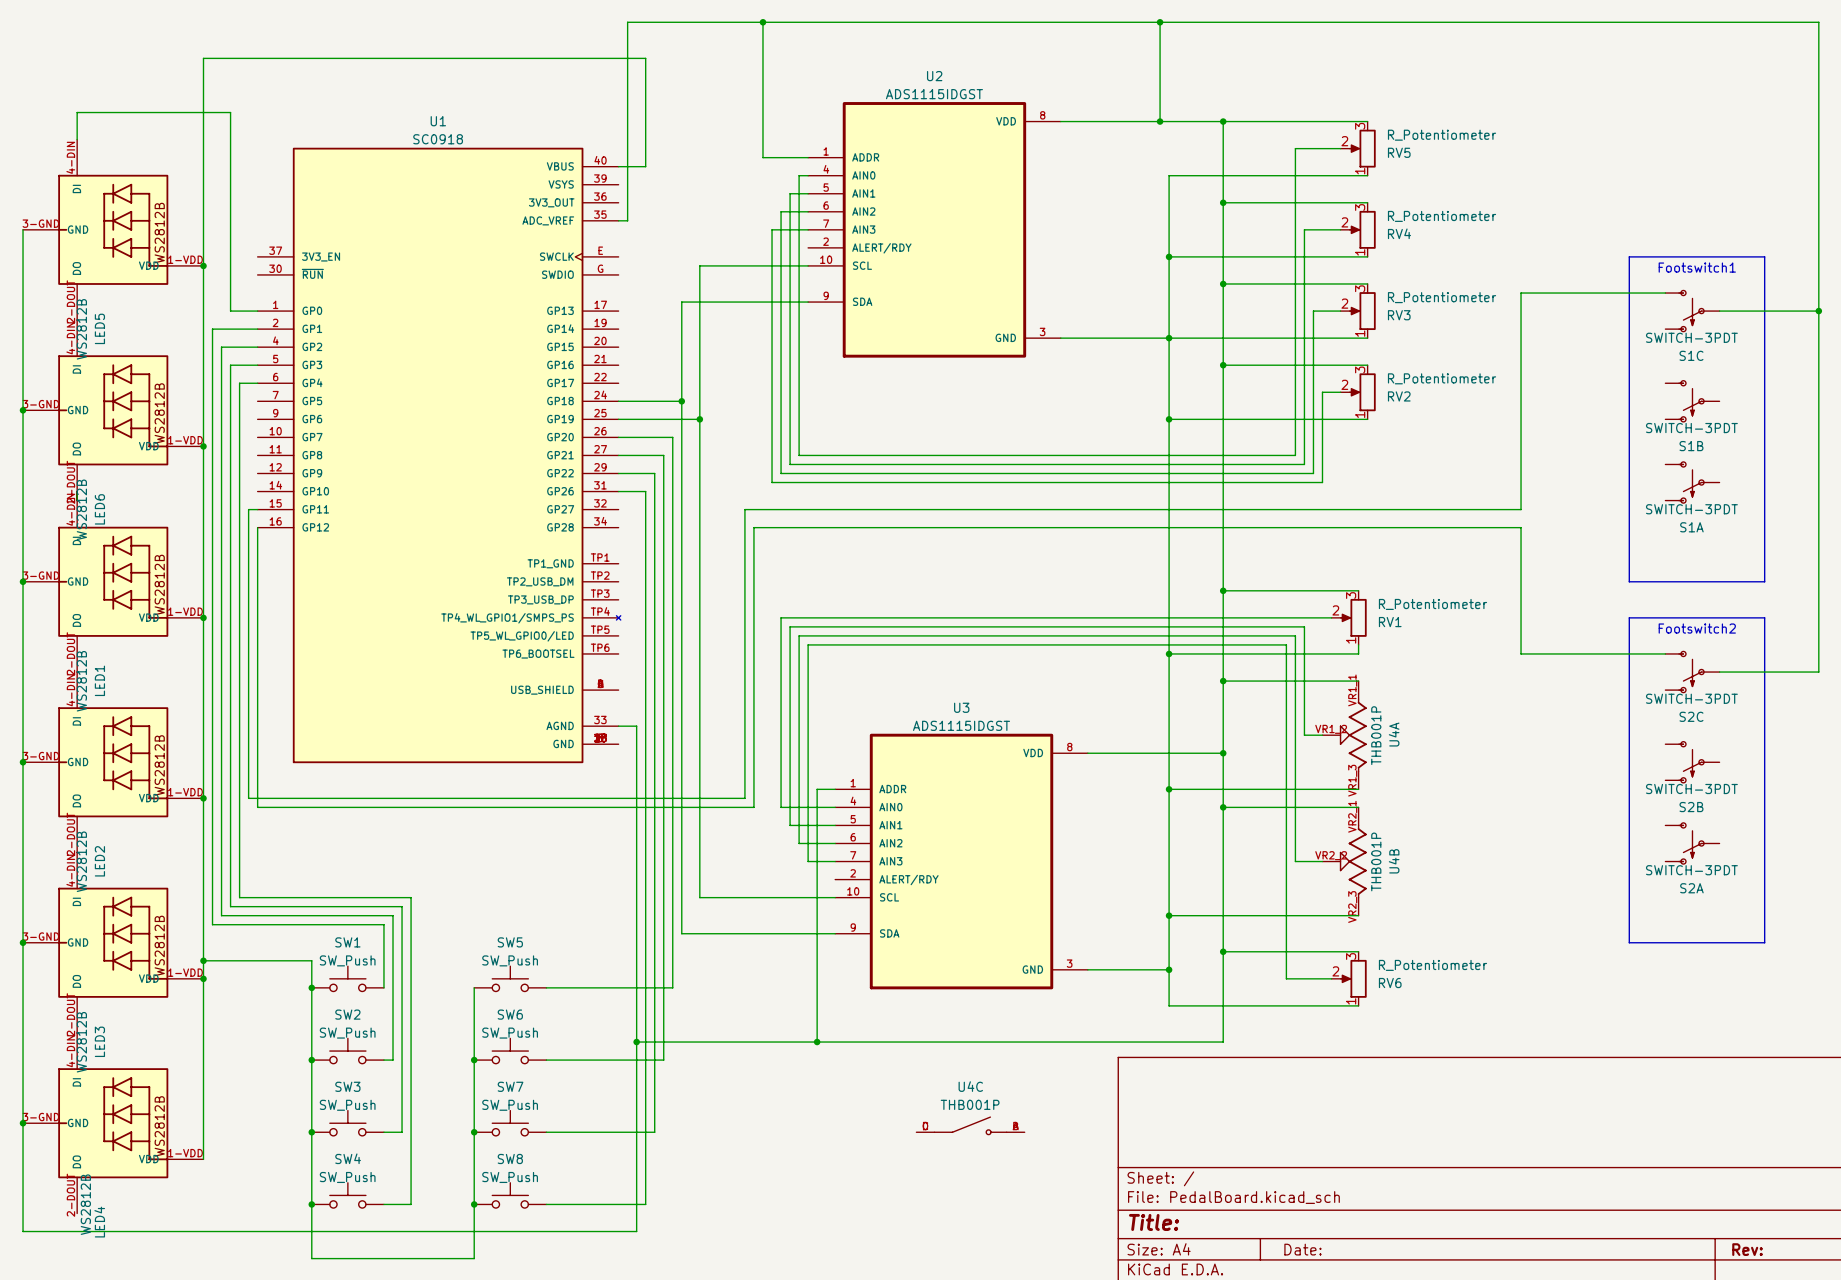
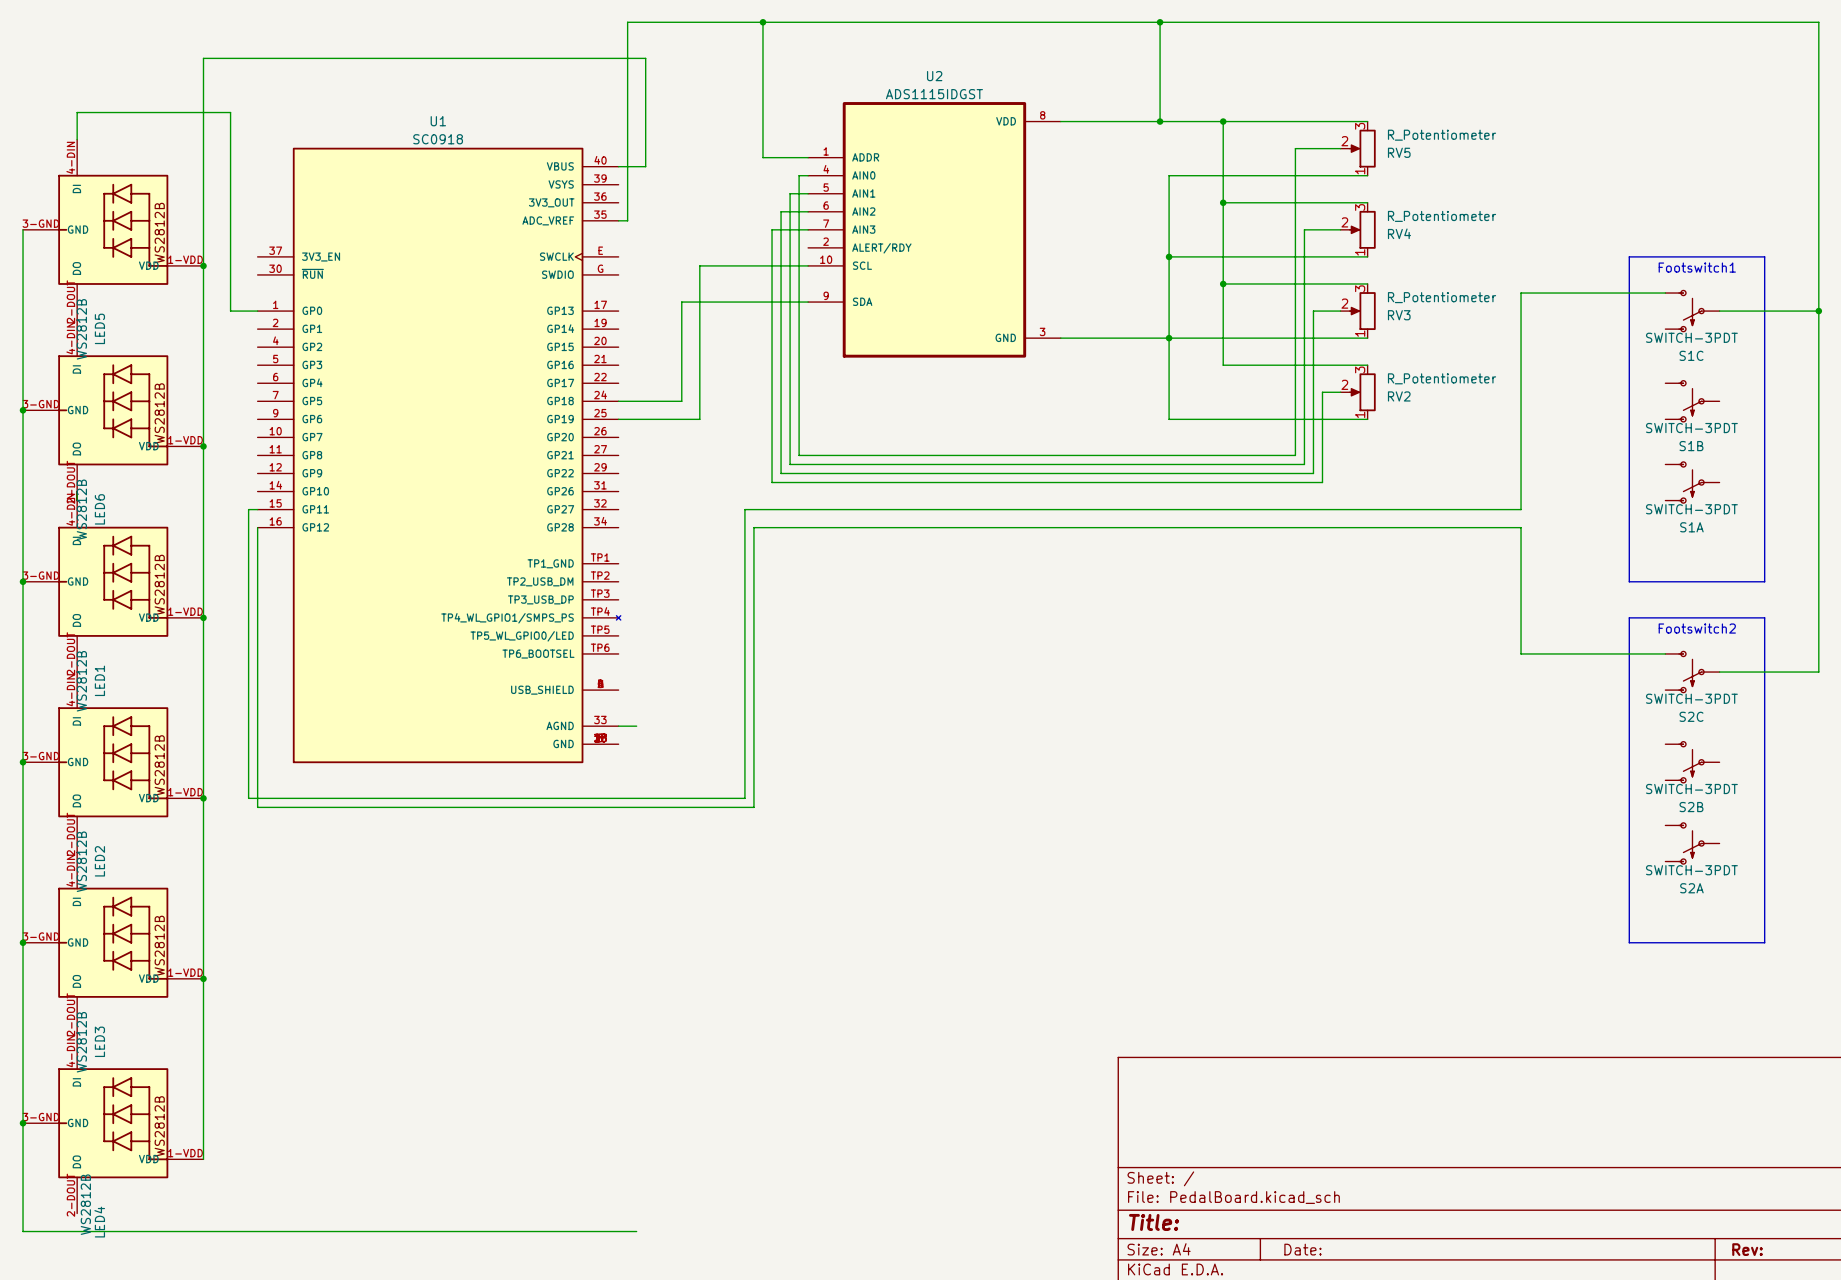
wire: (257, 329) (212, 329) (212, 924) (383, 924) (383, 987) -> none
wire: (257, 347) (221, 347) (221, 915) (393, 915) (393, 1060) (383, 1060) -> none
wire: (257, 365) (230, 365) (230, 906) (402, 906) (402, 1132) (383, 1132) -> none
wire: (1223, 365) (1223, 1042) (636, 1042) -> none
junction: (1223, 365) -> none
wire: (257, 383) (239, 383) (239, 897) (411, 897) (411, 1204) (383, 1204) -> none
wire: (681, 401) (681, 933) (835, 933) -> none
junction: (681, 401) -> none
wire: (699, 419) (699, 897) (835, 897) -> none
junction: (699, 419) -> none
wire: (1169, 419) (1169, 1005) (1358, 1005) -> none
junction: (1169, 419) -> none
wire: (618, 437) (672, 437) (672, 987) (546, 987) -> none
wire: (618, 455) (663, 455) (663, 1060) (546, 1060) -> none
wire: (618, 473) (654, 473) (654, 1132) (546, 1132) -> none
wire: (618, 491) (645, 491) (645, 1204) (546, 1204) -> none
wire: (1223, 590) (1358, 590) -> none
junction: (1223, 590) -> none
wire: (1331, 617) (781, 617) (781, 807) (835, 807) -> none
RV1: R_Potentiometer (1349, 617) -> none
wire: (1358, 644) (1358, 653) (1169, 653) -> none
junction: (1169, 653) -> none
wire: (1223, 681) (1358, 681) -> none
junction: (1223, 681) -> none
wire: (636, 726) (636, 1231) -> none
wire: (1322, 735) (1304, 735) (1304, 626) (790, 626) (790, 825) (835, 825) -> none
U4A: THB001P (1344, 735) -> none
wire: (1087, 753) (1223, 753) -> none
junction: (1223, 753) -> none
wire: (835, 789) (817, 789) (817, 1042) -> none
wire: (1169, 789) (1358, 789) -> none
junction: (1169, 789) -> none
wire: (1223, 807) (1358, 807) -> none
junction: (1223, 807) -> none
wire: (835, 843) (799, 843) (799, 635) (1295, 635) (1295, 861) (1322, 861) -> none
wire: (835, 861) (808, 861) (808, 644) (1286, 644) (1286, 978) (1331, 978) -> none
U3: ADS1115IDGST (961, 861) -> none
U4B: THB001P (1344, 861) -> none
wire: (1169, 915) (1358, 915) -> none
junction: (1169, 915) -> none
wire: (1223, 951) (1358, 951) -> none
junction: (1223, 951) -> none
wire: (203, 960) (311, 960) (311, 1258) (474, 1258) (474, 987) -> none
junction: (203, 960) -> none
wire: (1087, 969) (1169, 969) -> none
junction: (1169, 969) -> none
SW1: SW_Push (347, 978) -> none
SW5: SW_Push (510, 978) -> none
RV6: R_Potentiometer (1349, 978) -> none
junction: (311, 987) -> none
junction: (636, 1042) -> none
junction: (817, 1042) -> none
SW2: SW_Push (347, 1051) -> none
SW6: SW_Push (510, 1051) -> none
junction: (311, 1060) -> none
junction: (474, 1060) -> none
SW3: SW_Push (347, 1123) -> none
SW7: SW_Push (510, 1123) -> none
U4C: THB001P (970, 1125) -> none
junction: (311, 1132) -> none
junction: (474, 1132) -> none
SW4: SW_Push (347, 1195) -> none
SW8: SW_Push (510, 1195) -> none
junction: (311, 1204) -> none
junction: (474, 1204) -> none

